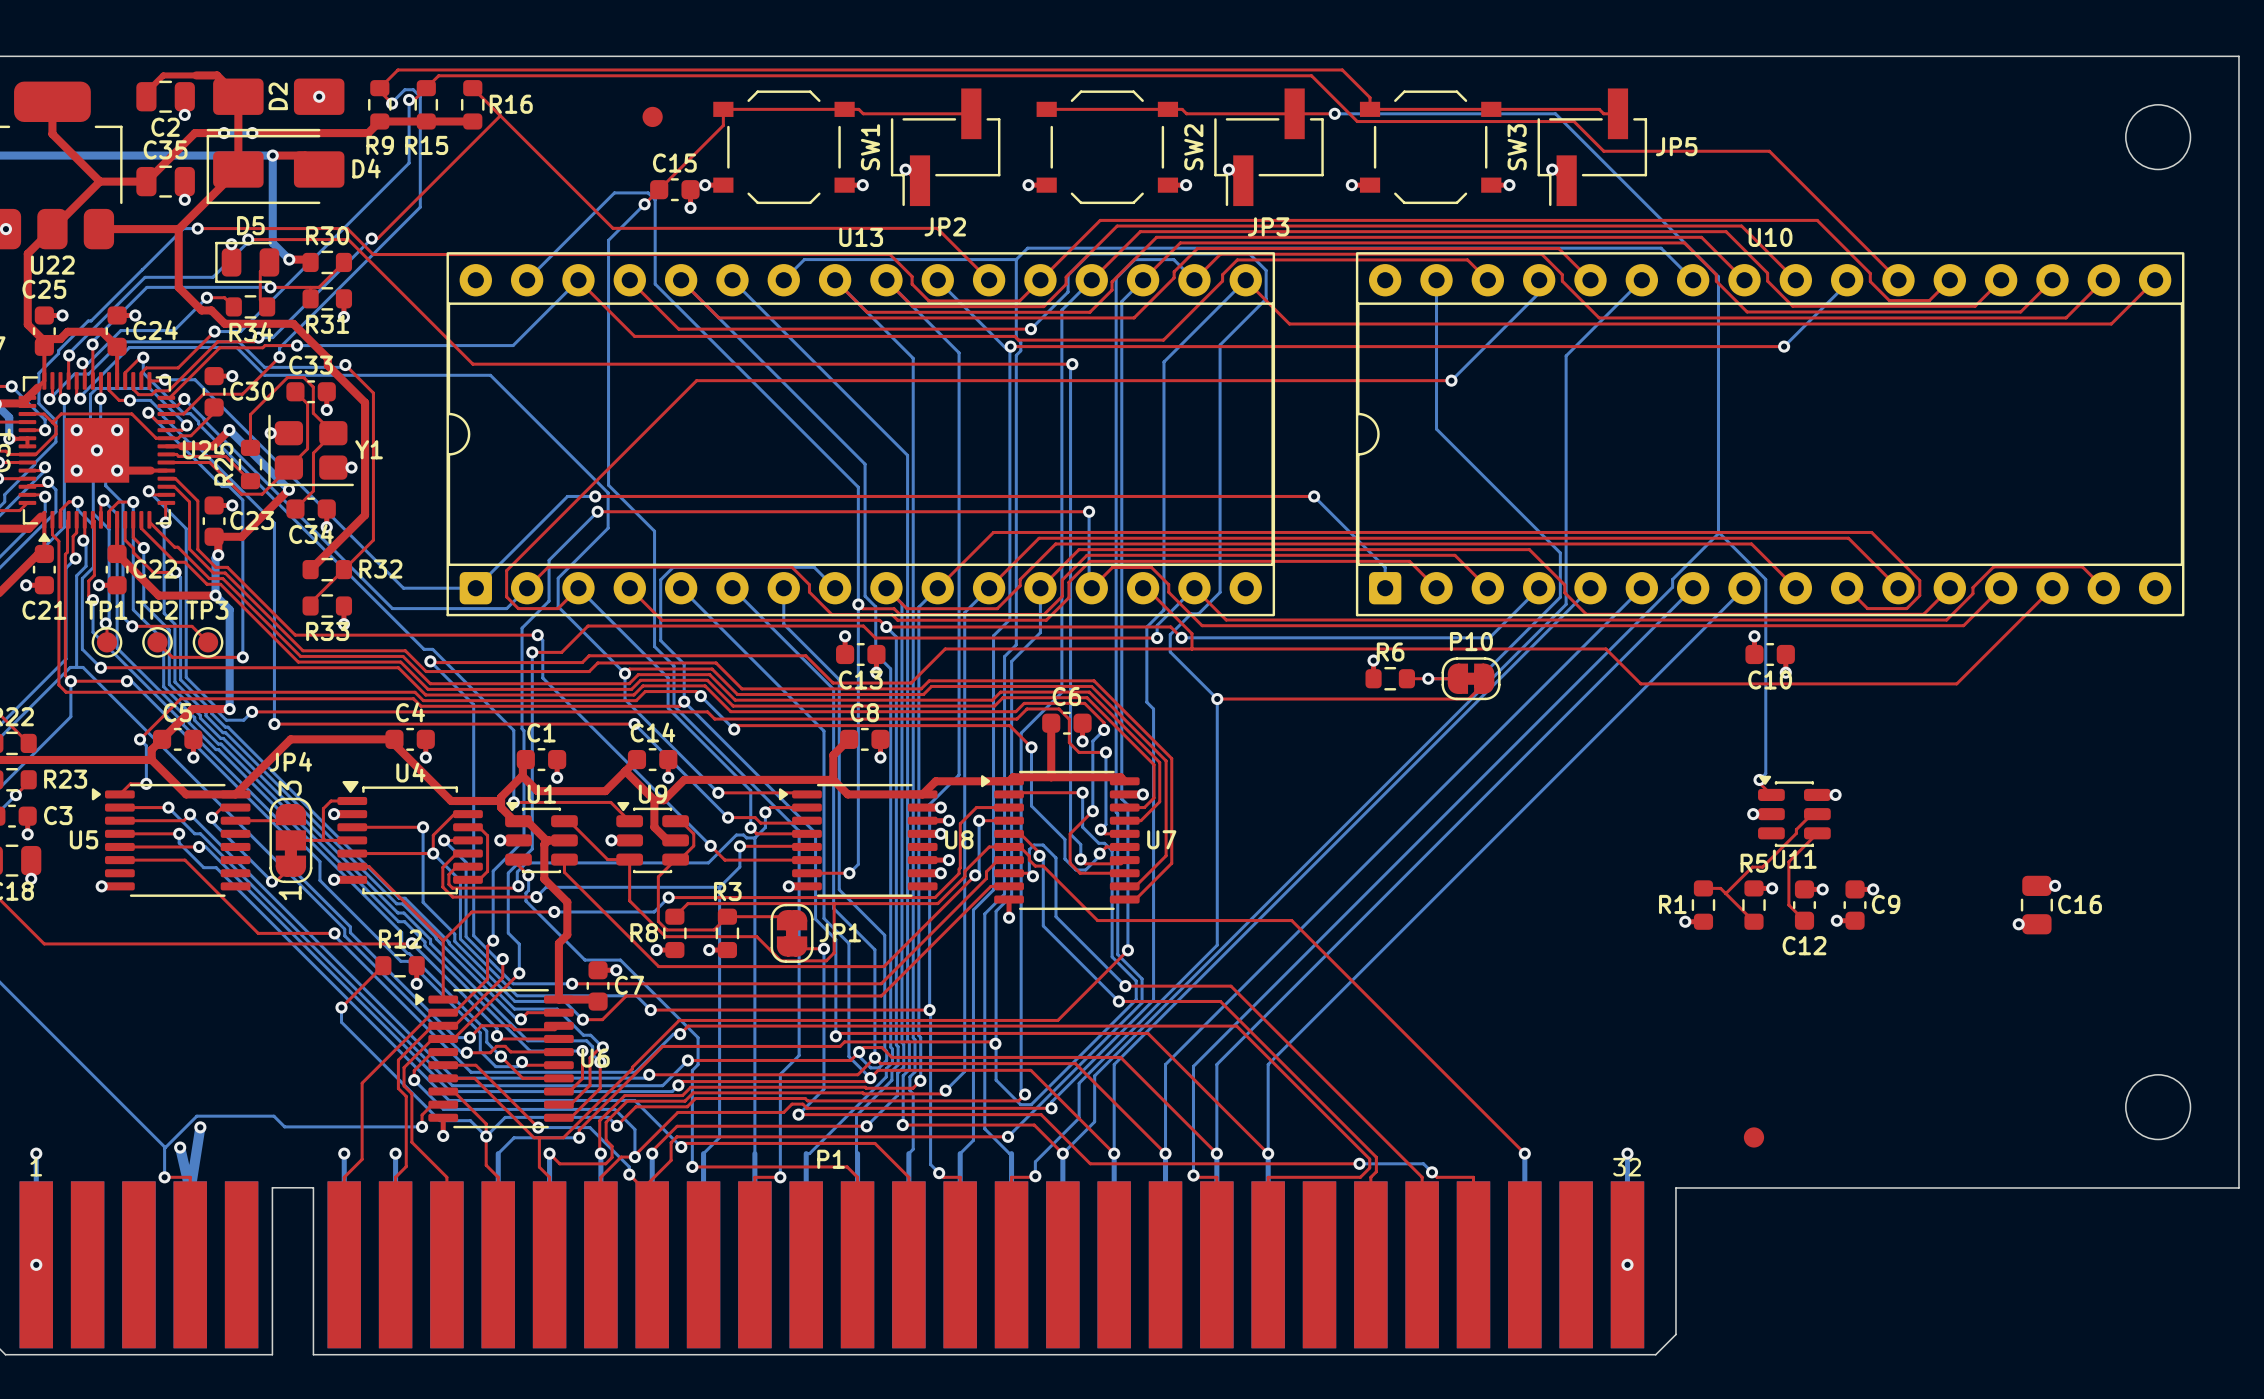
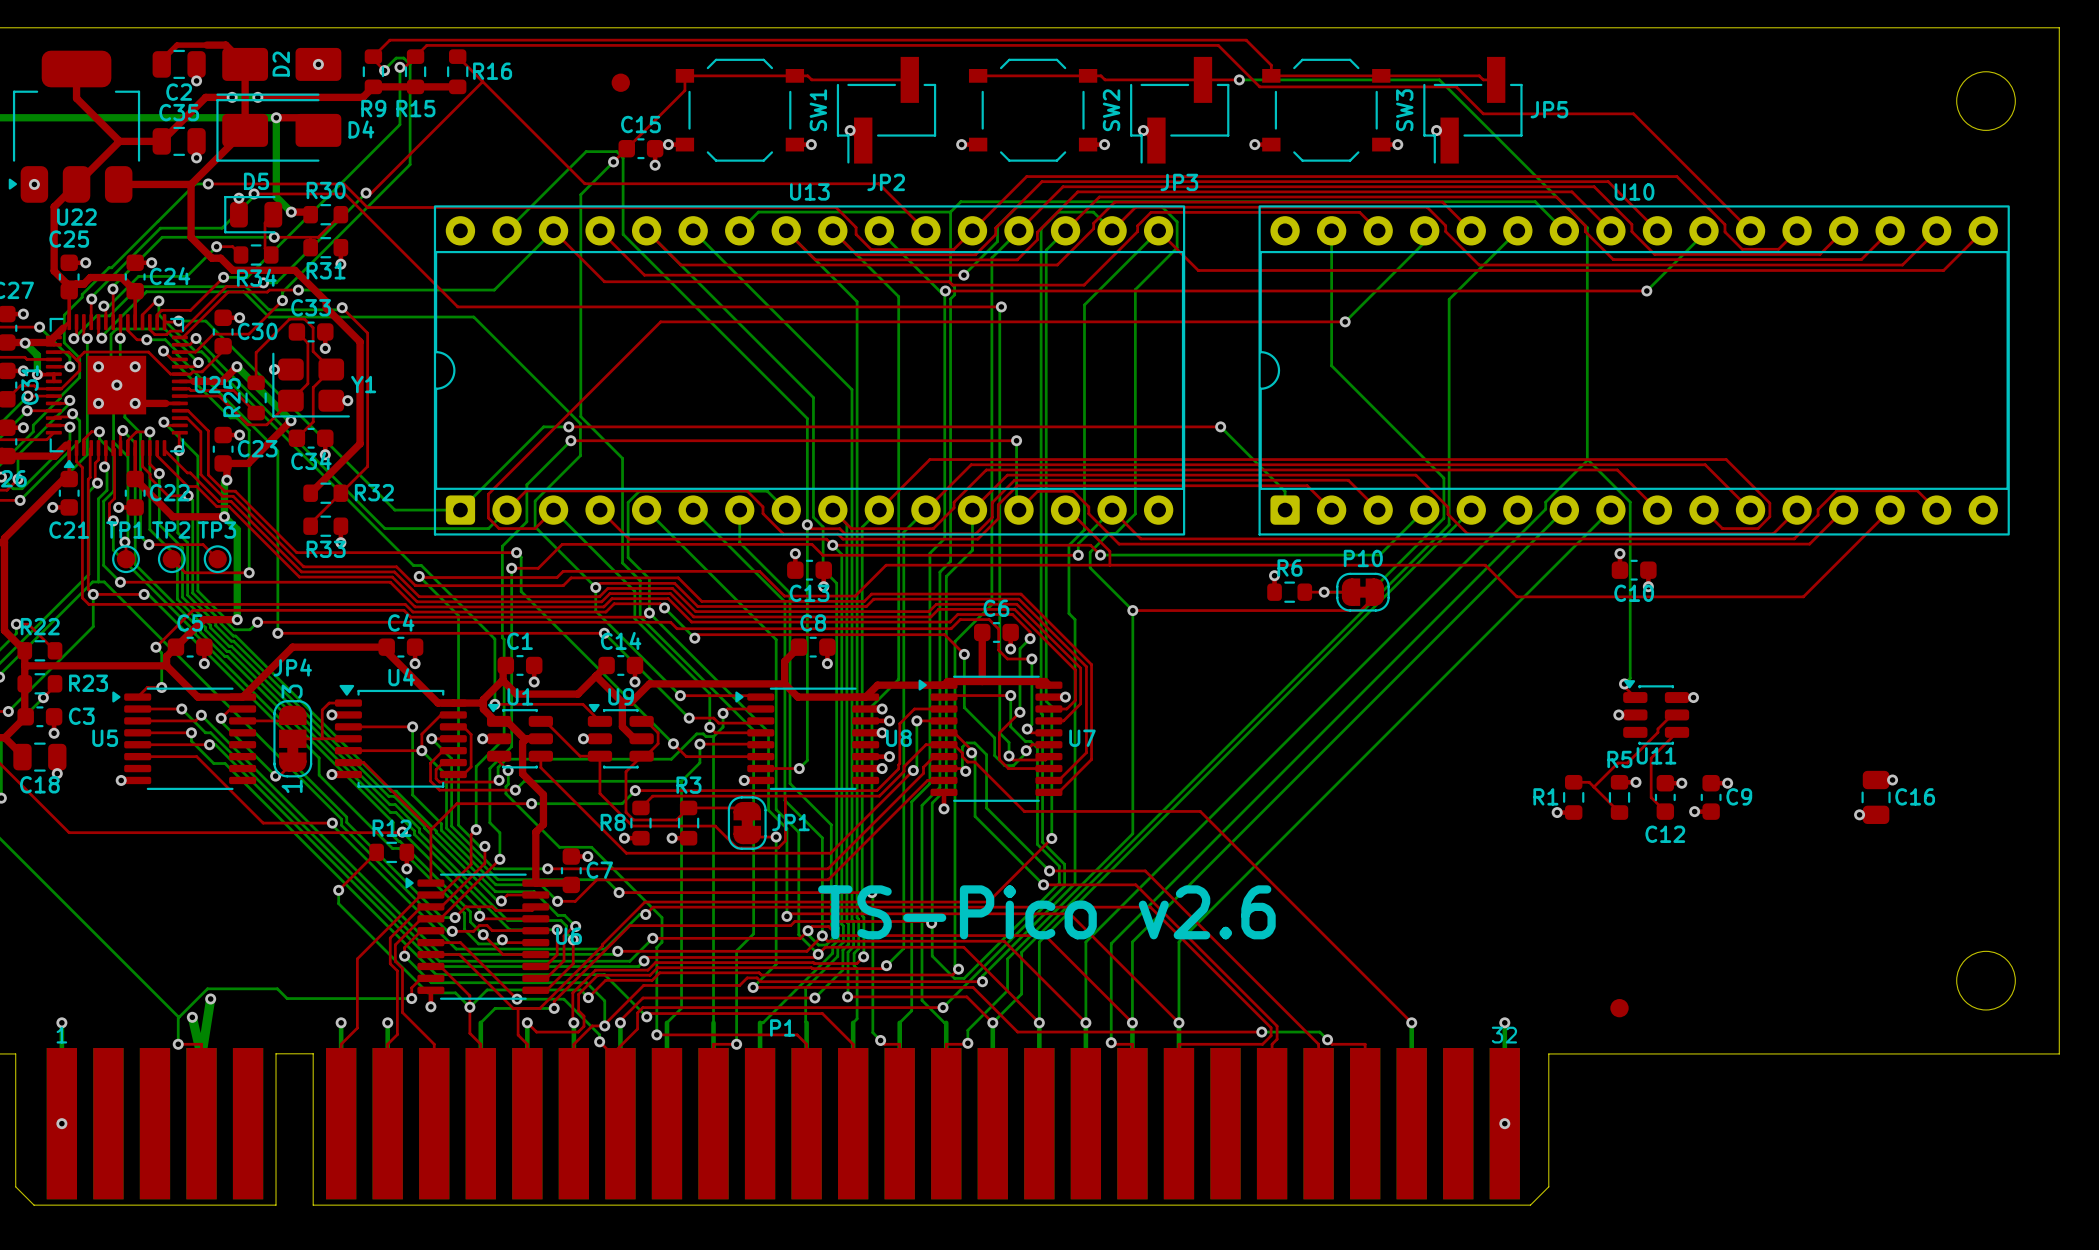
text: none -> TS-Pico v2.6 (1046, 912)

